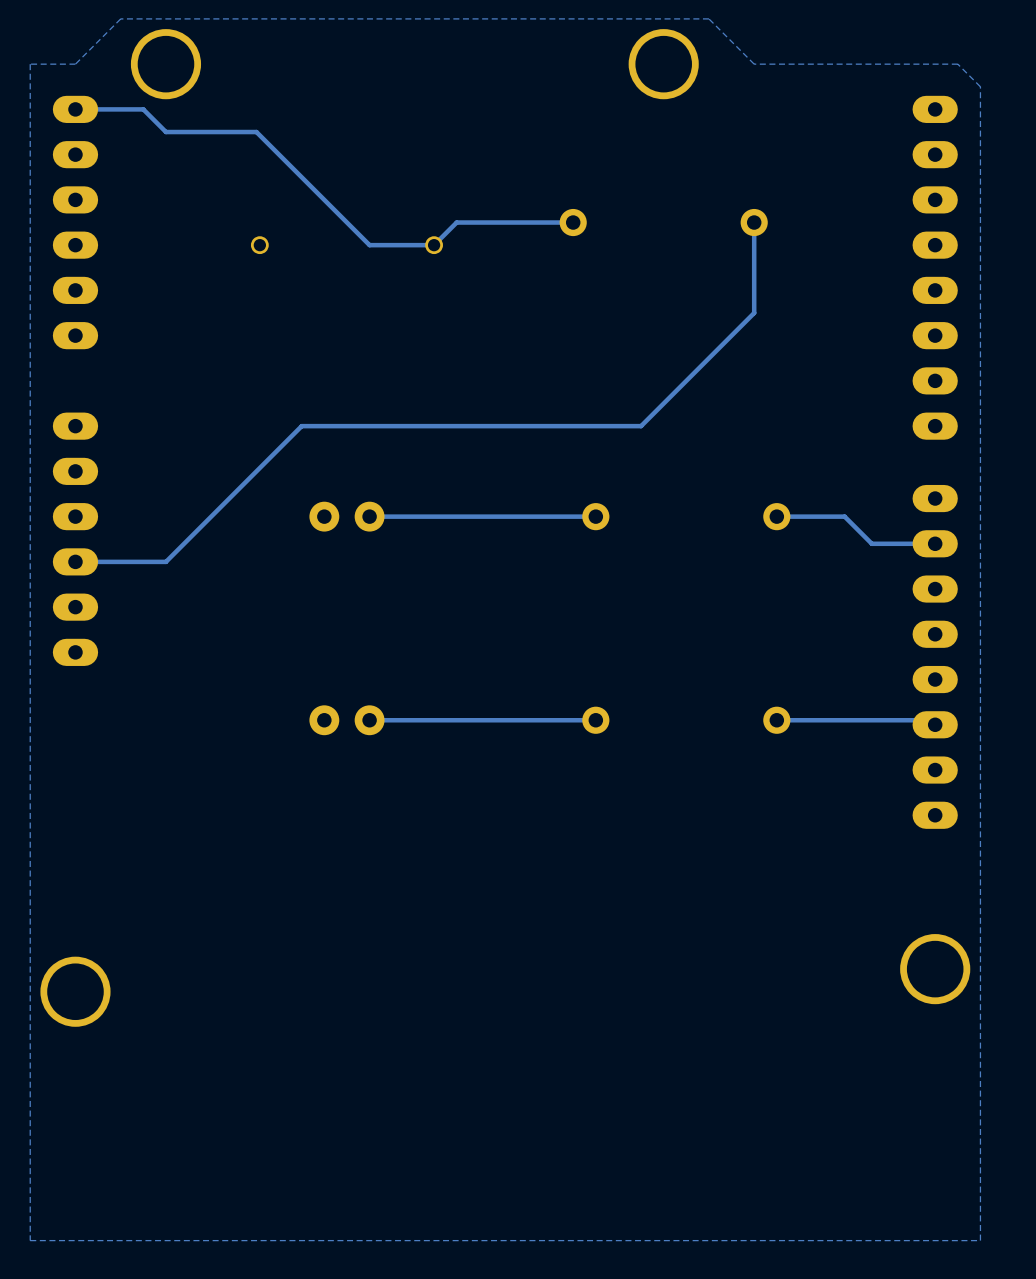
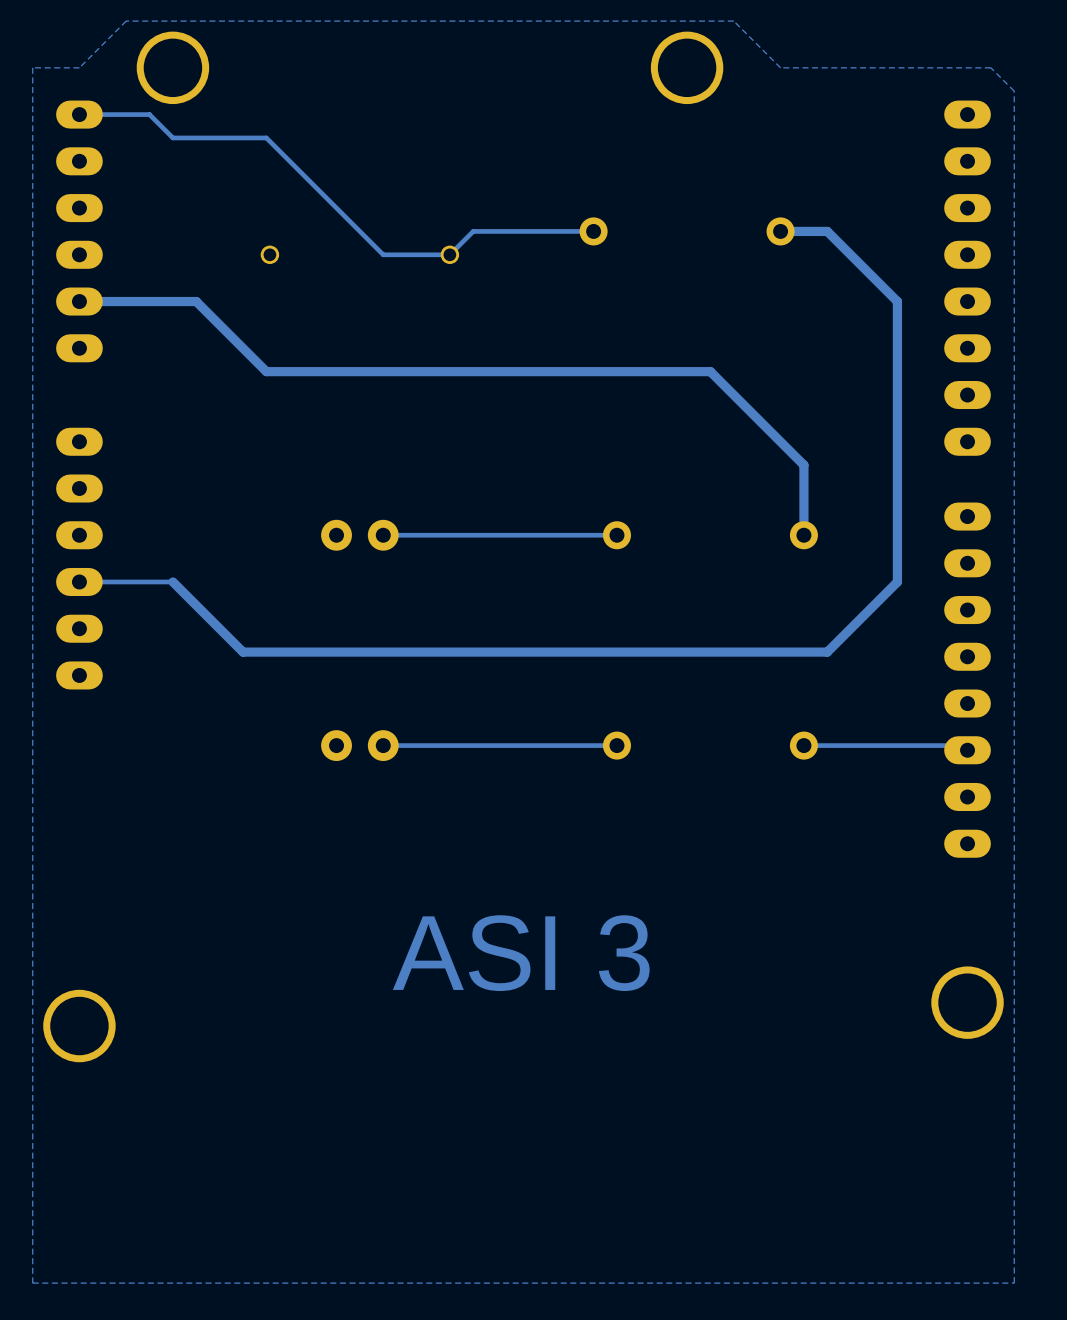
track: (754, 222) (754, 313) (641, 426) (301, 426) (165, 561) -> (780, 231) (827, 231) (897, 301) (897, 581) (827, 652) (243, 652) (172, 581)
track: (776, 516) (844, 516) (871, 543) (935, 543) -> (803, 535) (803, 465) (710, 371) (266, 371) (196, 301) (79, 301)
text: none -> ASI 3 (521, 953)

